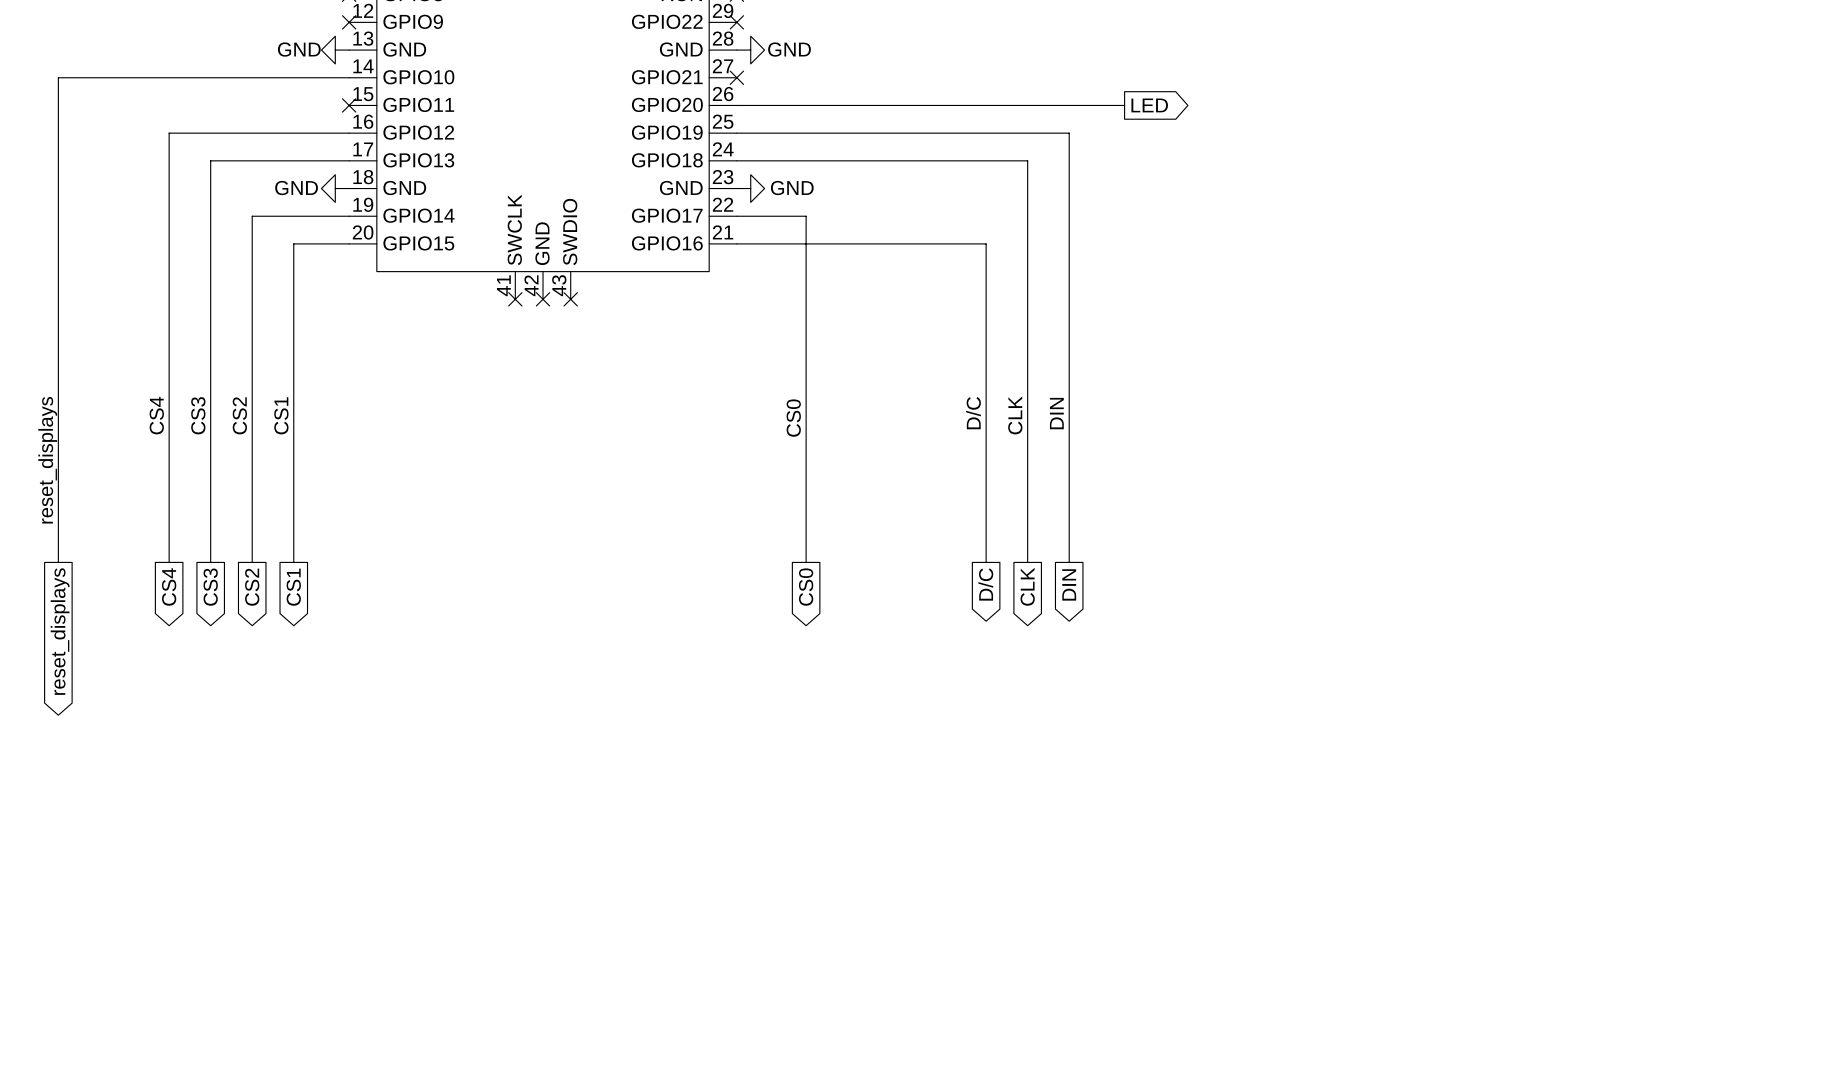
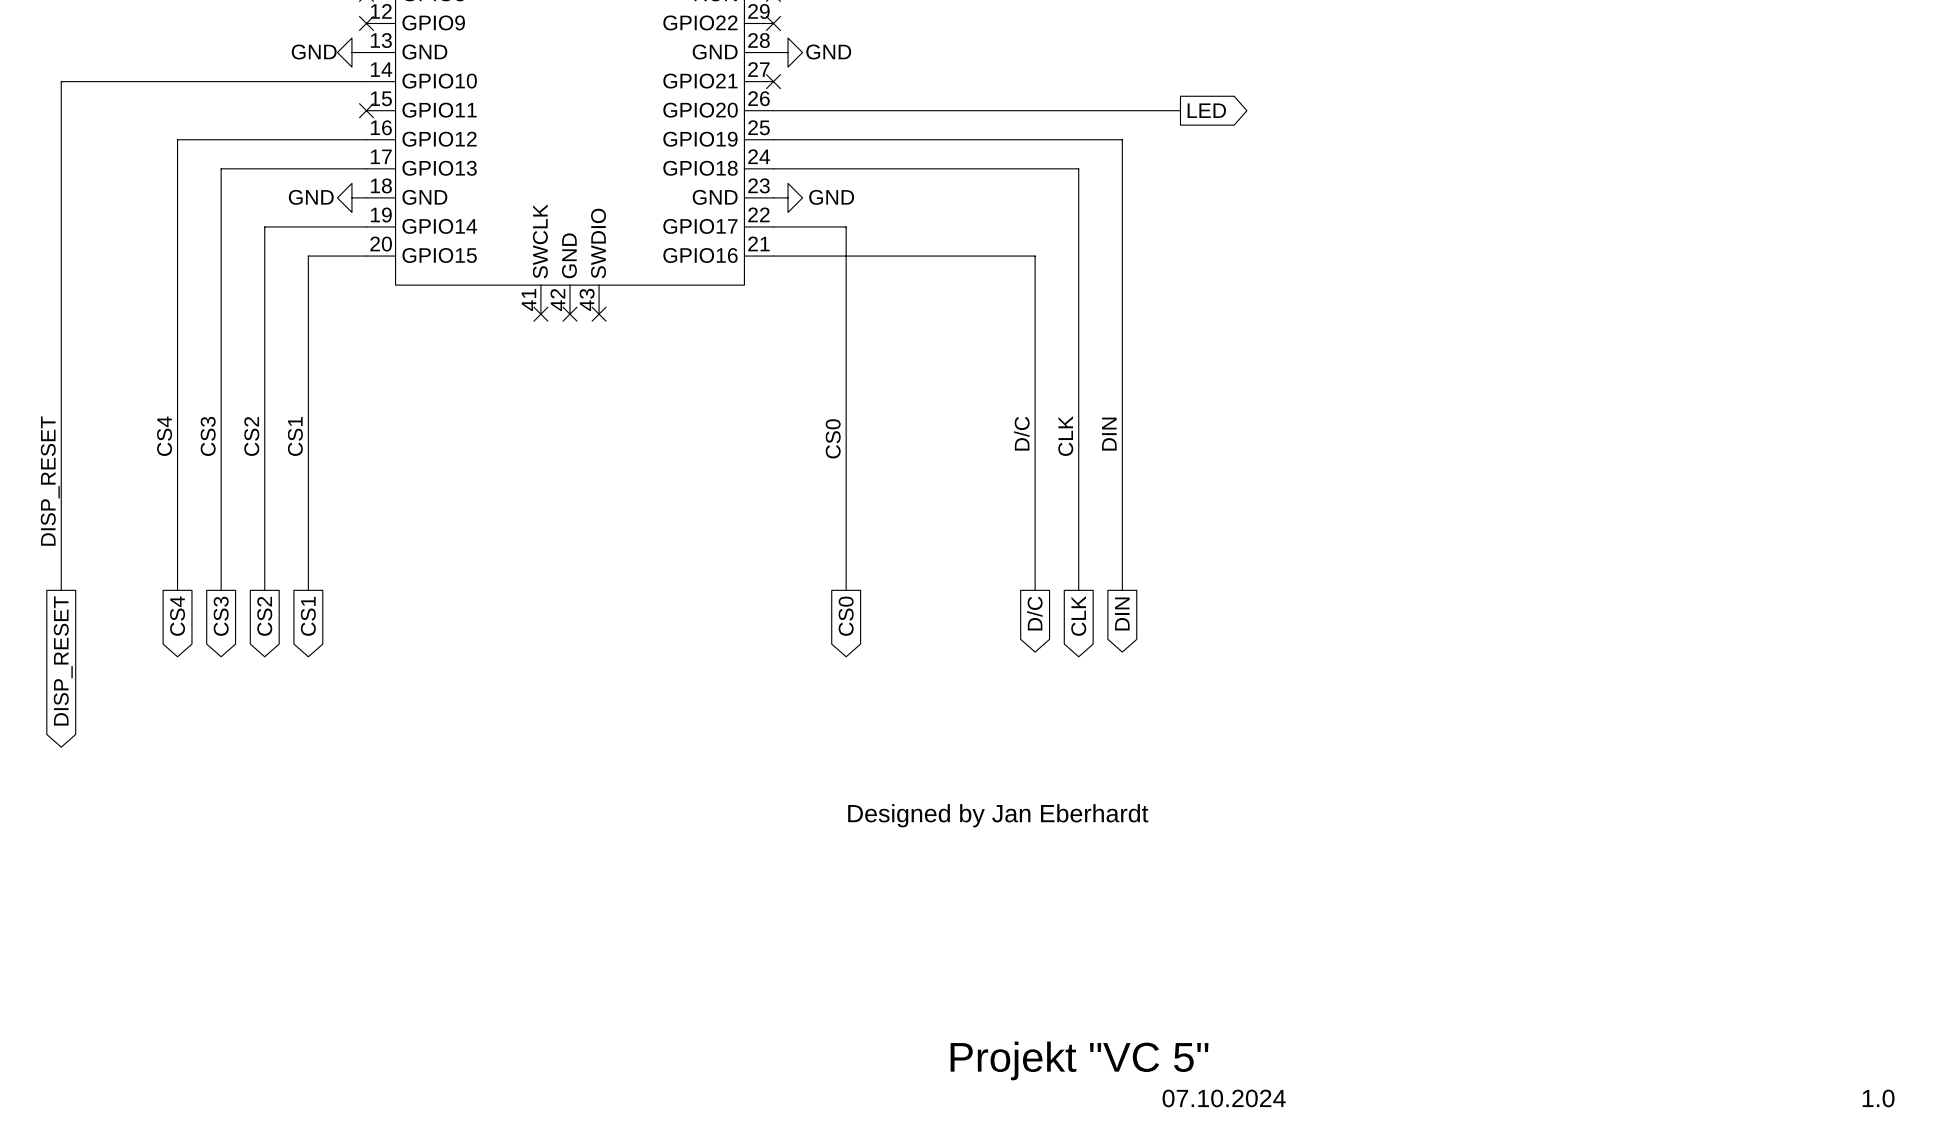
label: reset_displays (47, 460) -> DISP_RESET (50, 481)
global label: reset_displays (60, 631) -> DISP_RESET (63, 660)
text: none -> Designed by Jan Eberhardt (998, 815)
text: none -> Projekt "VC 5" (1079, 1060)
text: none -> 07.10.2024 (1224, 1098)
text: none -> 1.0 (1878, 1098)

